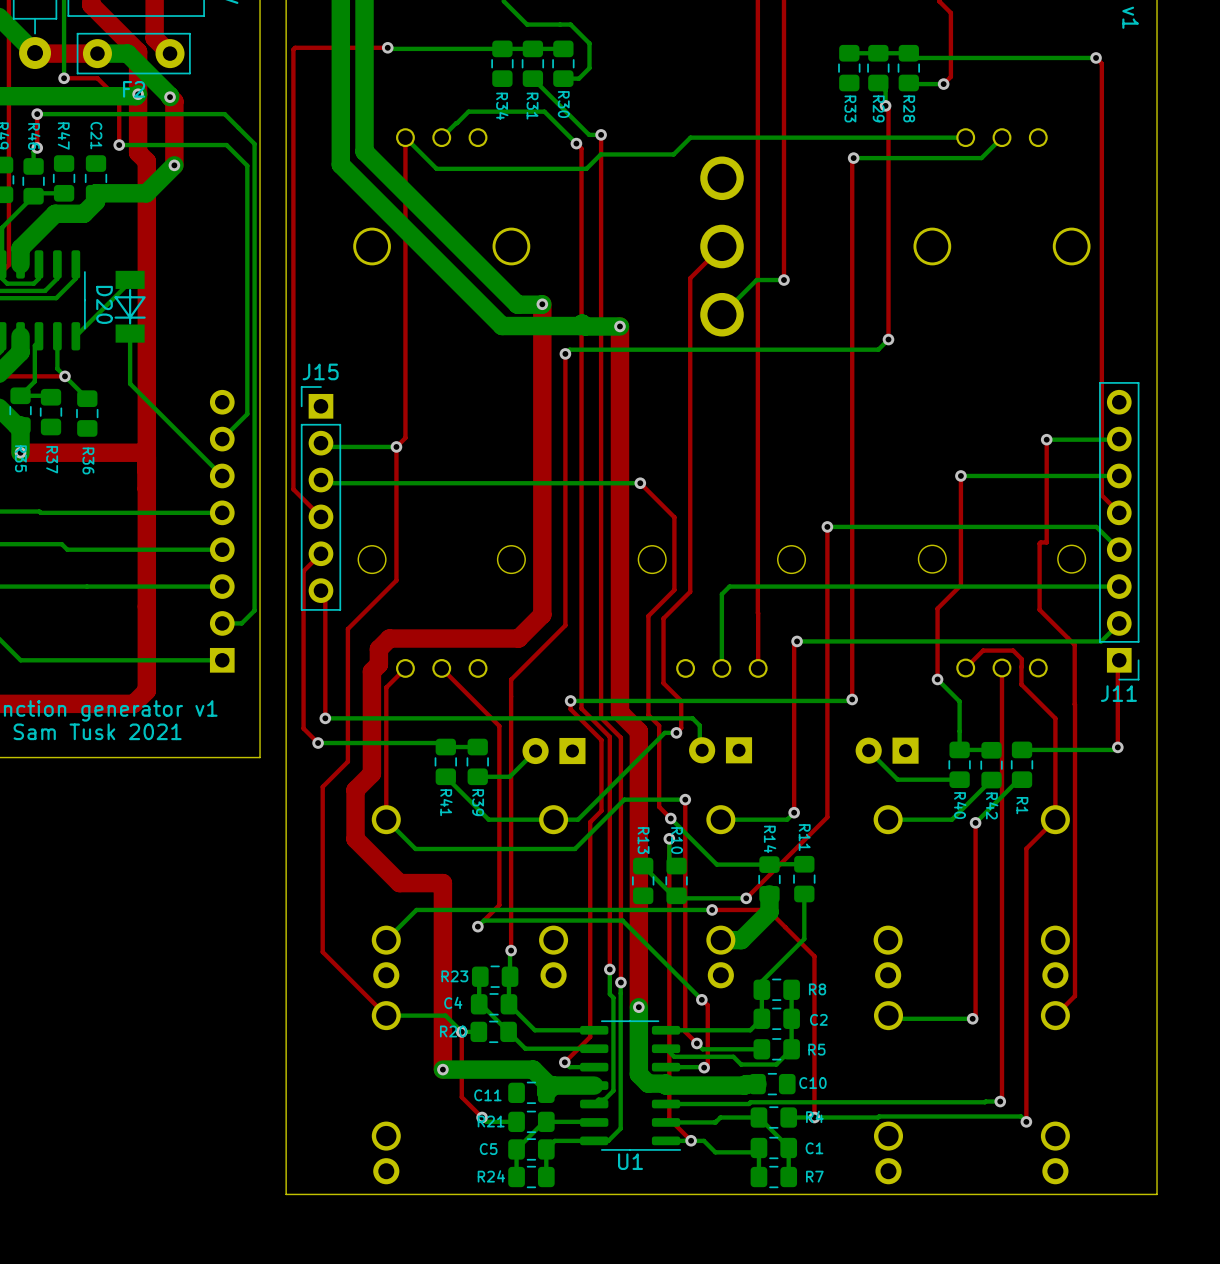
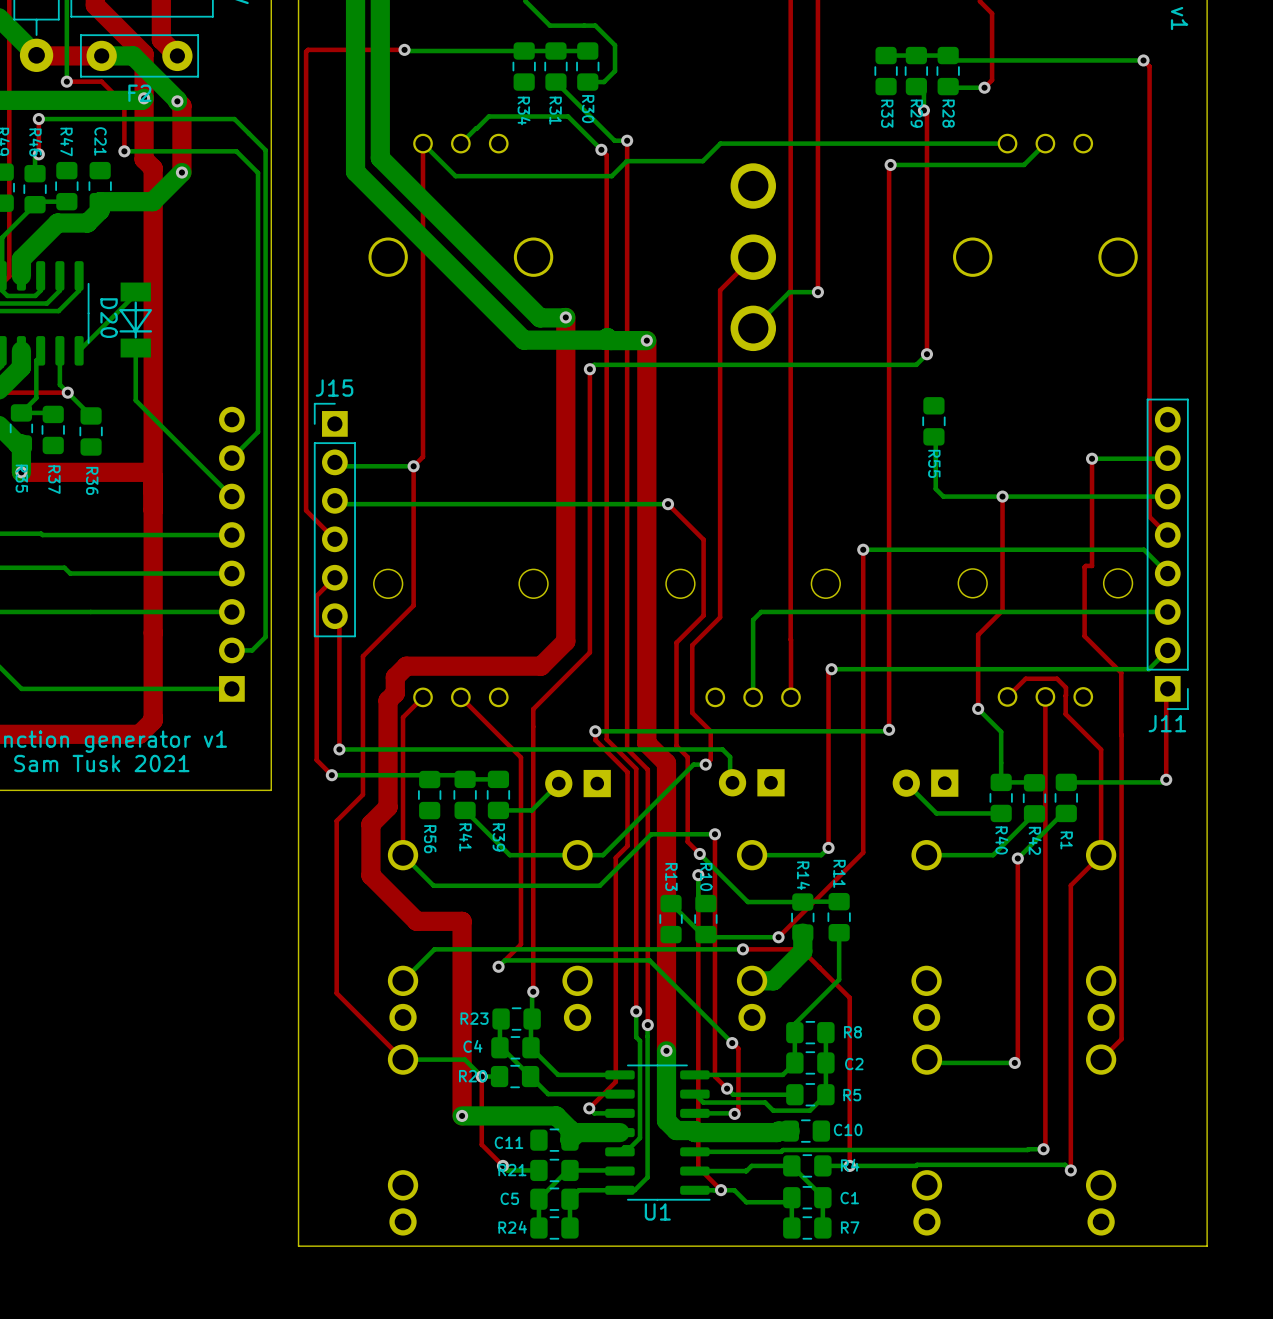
R55: none -> (933, 421)
bottom track: none -> (933, 436) (935, 438) (935, 488) (943, 496) (1002, 496)
R56: none -> (429, 795)

